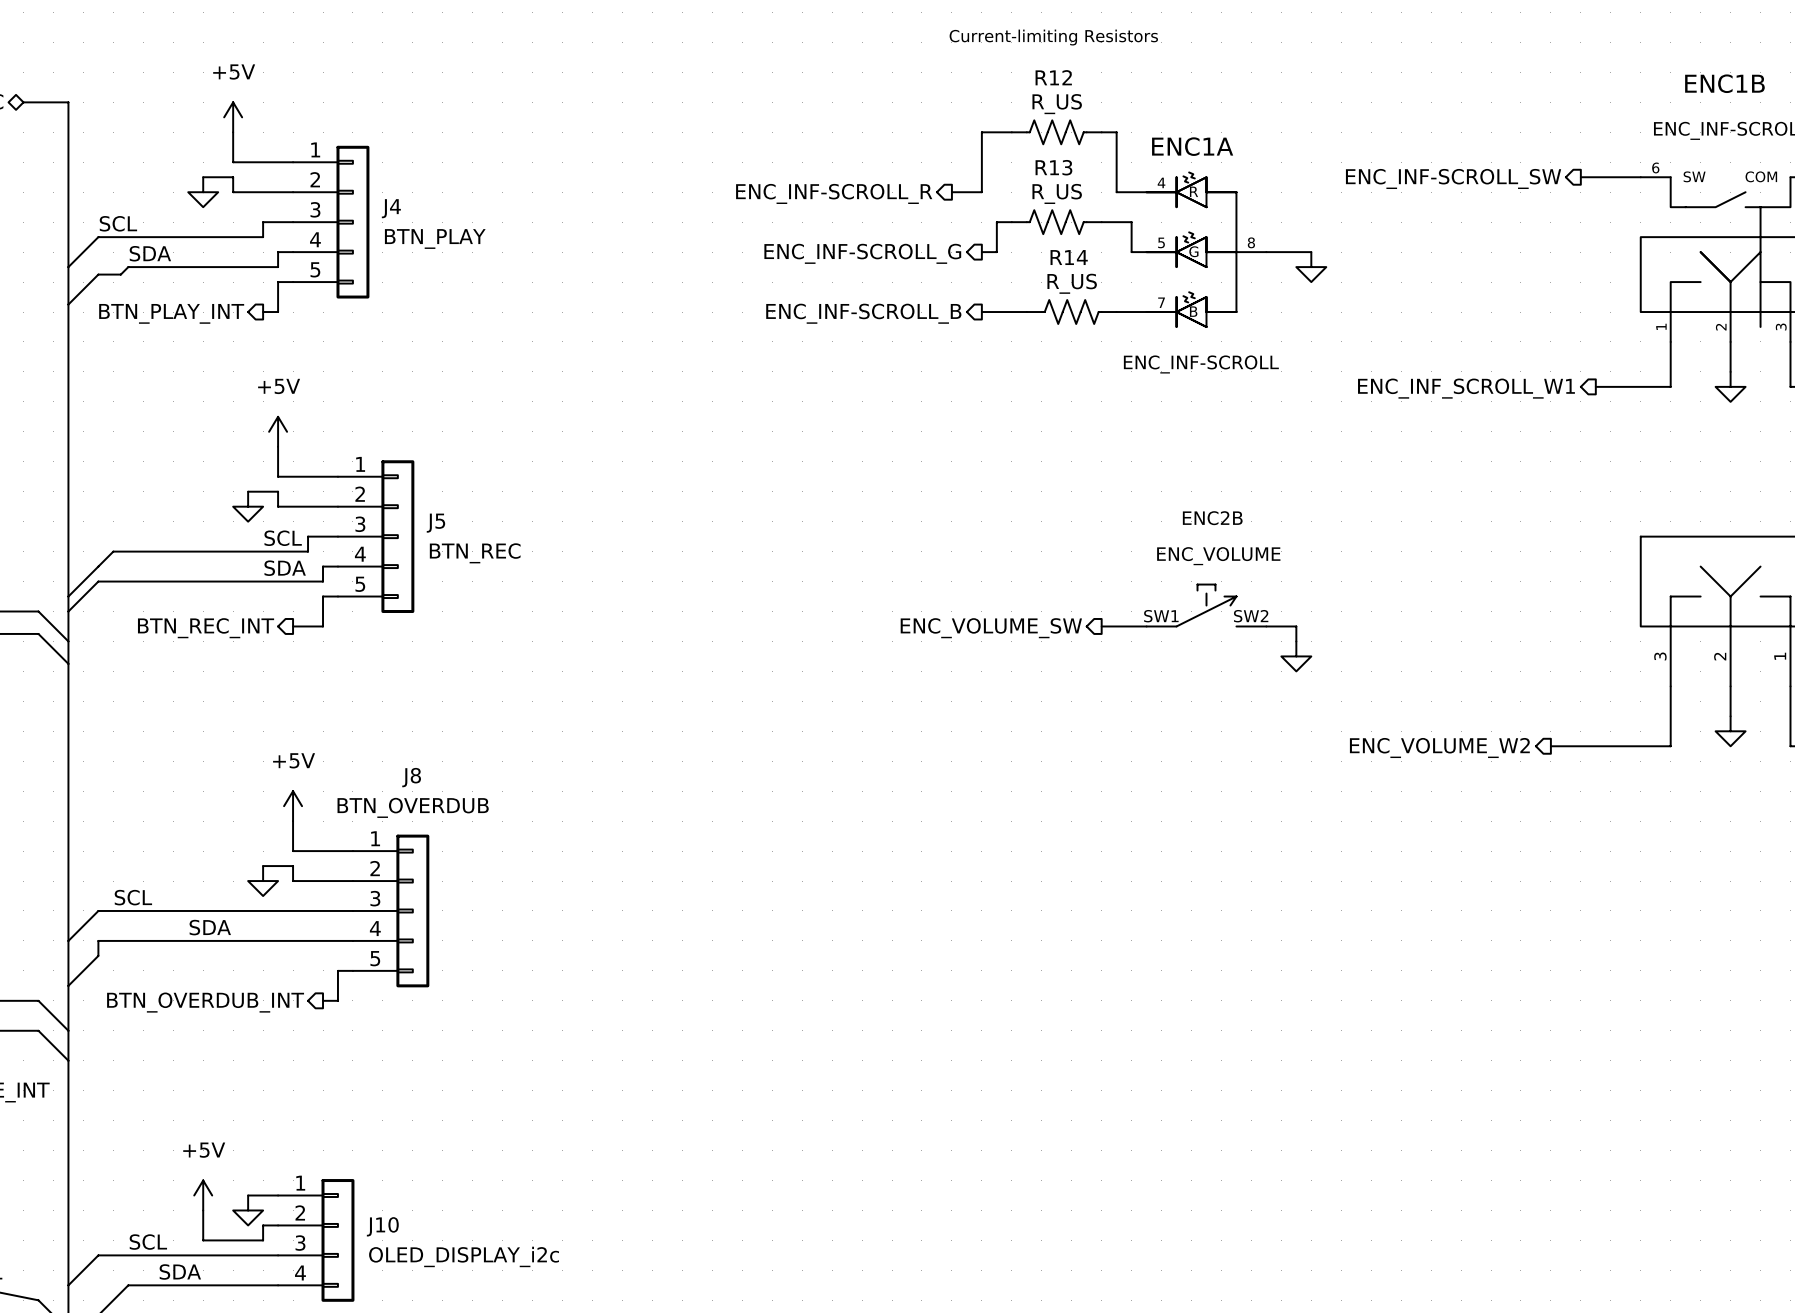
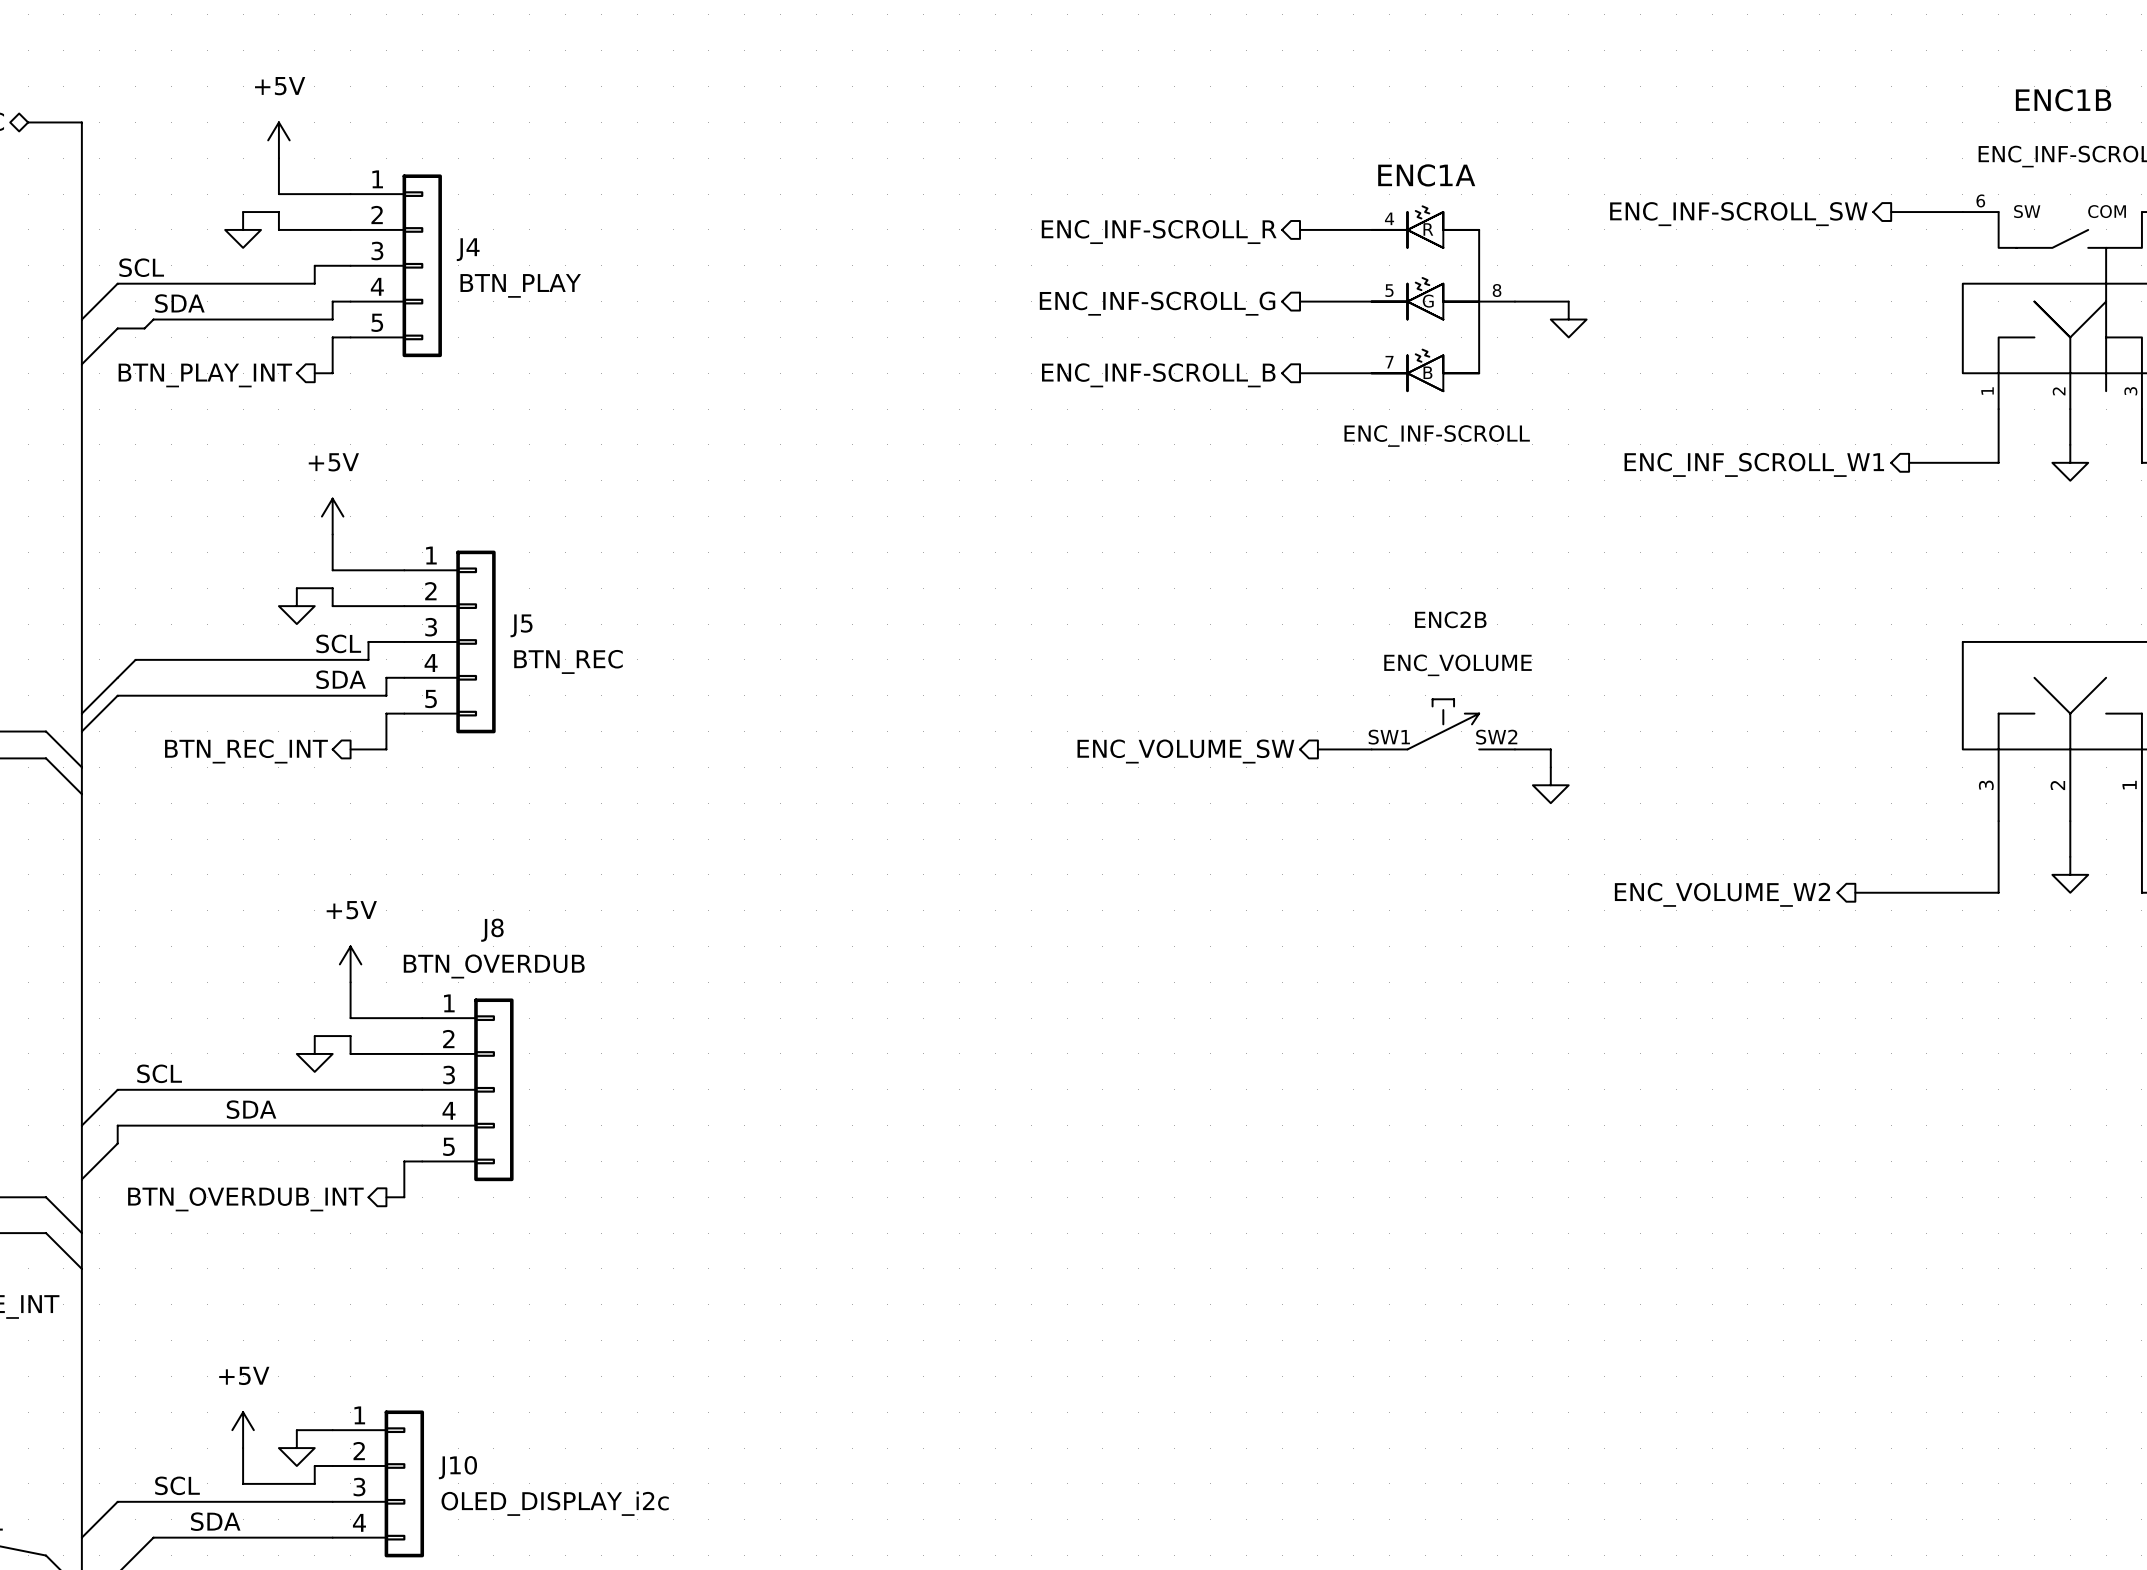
text: Current-limiting Resistors (1053, 37) -> none
wire: (1011, 132) (981, 132) (981, 192) (951, 192) -> none
R12: R_US (1056, 132) -> none
wire: (1101, 132) (1116, 132) (1116, 192) -> (1300, 229) (1335, 229)
hierarchical label position: ENC_INF-SCROLL_R (834, 193) -> ENC_INF-SCROLL_R (1159, 232)
wire: (1011, 222) (996, 222) (996, 252) (981, 252) -> none
R13: R_US (1056, 222) -> none
wire: (1101, 222) (1131, 222) (1131, 252) -> (1300, 301) (1353, 301)
hierarchical label position: ENC_INF-SCROLL_G (862, 253) -> ENC_INF-SCROLL_G (1157, 303)
wire: (981, 312) (1026, 312) -> none
R14: R_US (1071, 312) -> none
hierarchical label position: ENC_INF-SCROLL_B (863, 313) -> ENC_INF-SCROLL_B (1158, 375)

